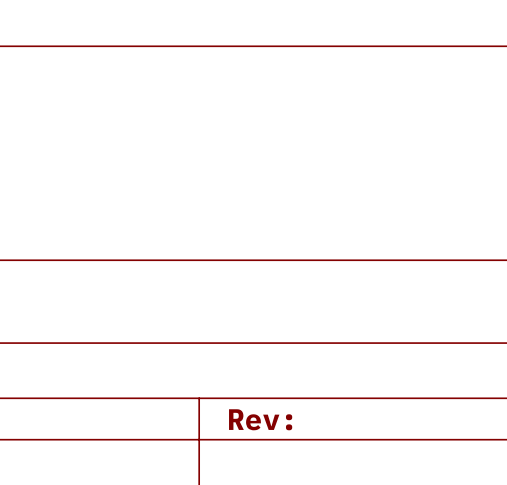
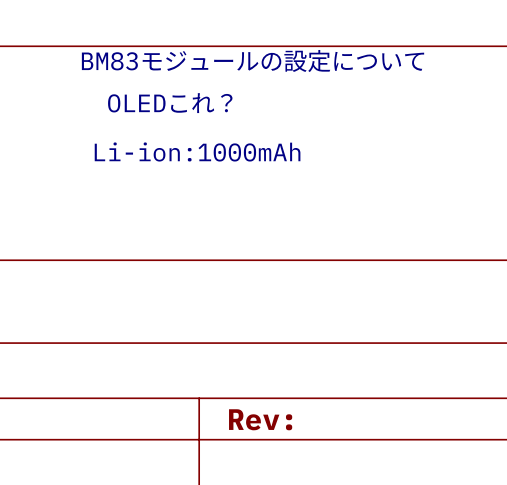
text: none -> BM83モジュールの設定について (253, 61)
text: none -> OLEDこれ？ (170, 103)
text: none -> Li-ion:1000mAh (197, 151)

